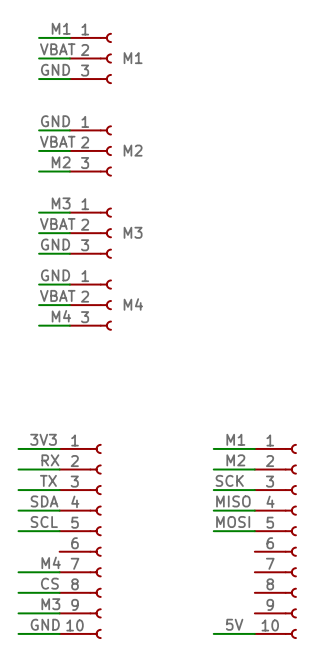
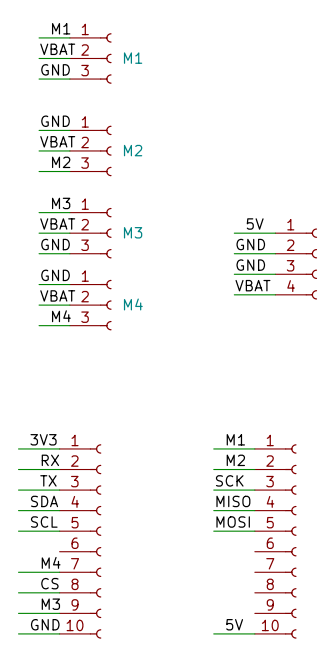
label: none -> 5V (255, 224)
wire: none -> (234, 233) (275, 233)
label: none -> GND (250, 244)
wire: none -> (234, 253) (275, 253)
part: none -> (296, 264)
label: none -> GND (250, 265)
wire: none -> (234, 274) (275, 274)
label: none -> VBAT (252, 285)
wire: none -> (234, 294) (275, 294)

